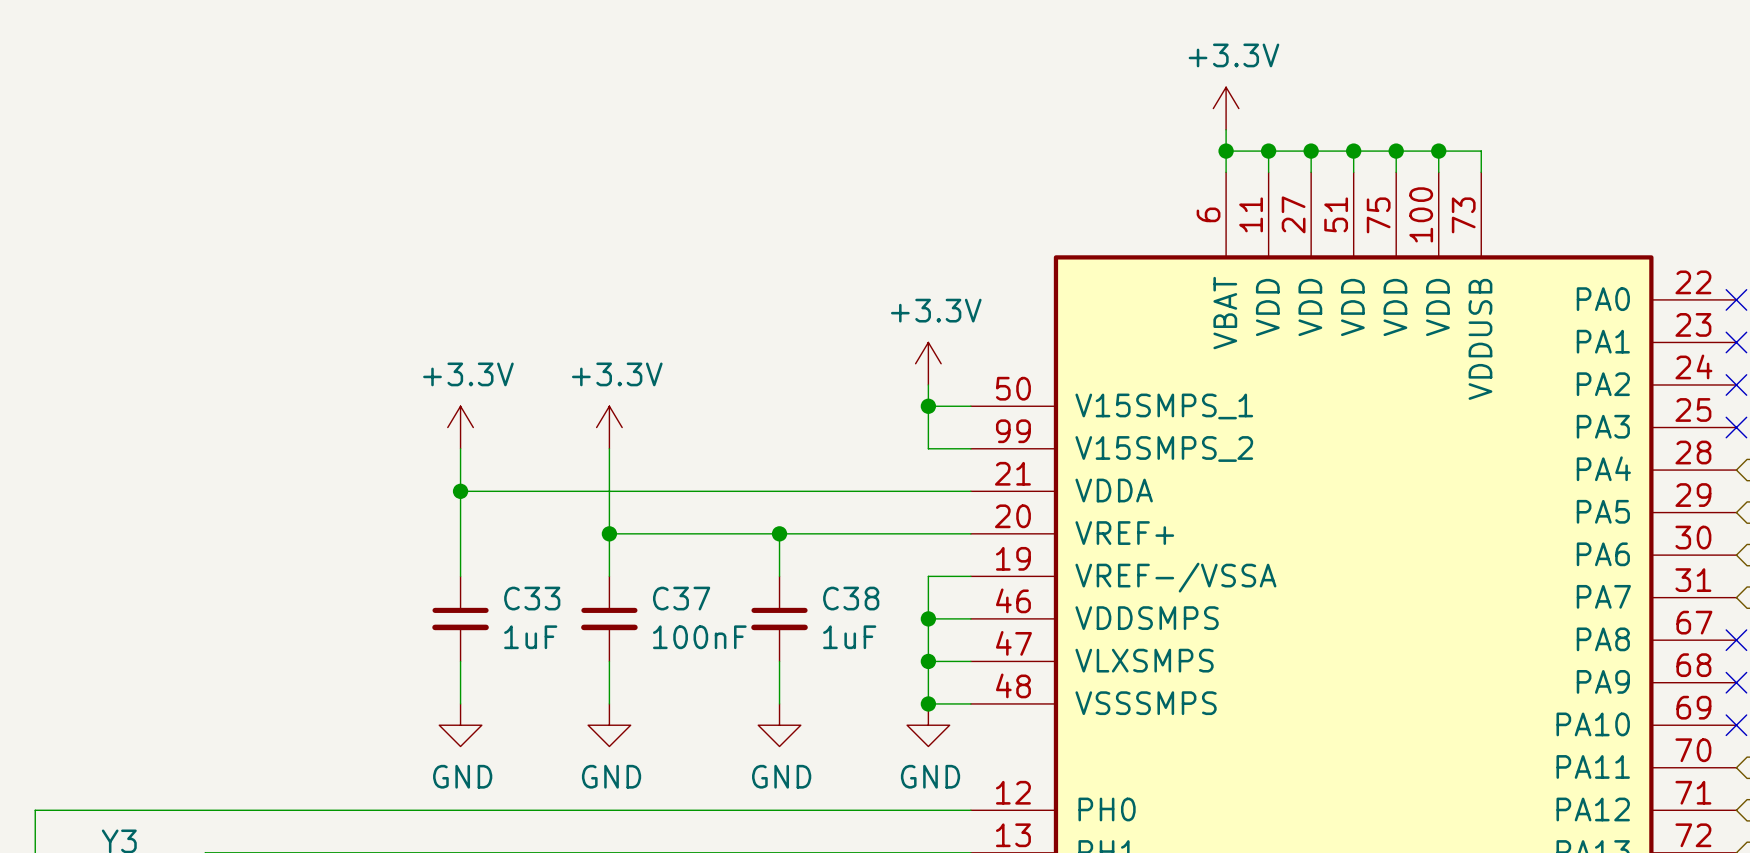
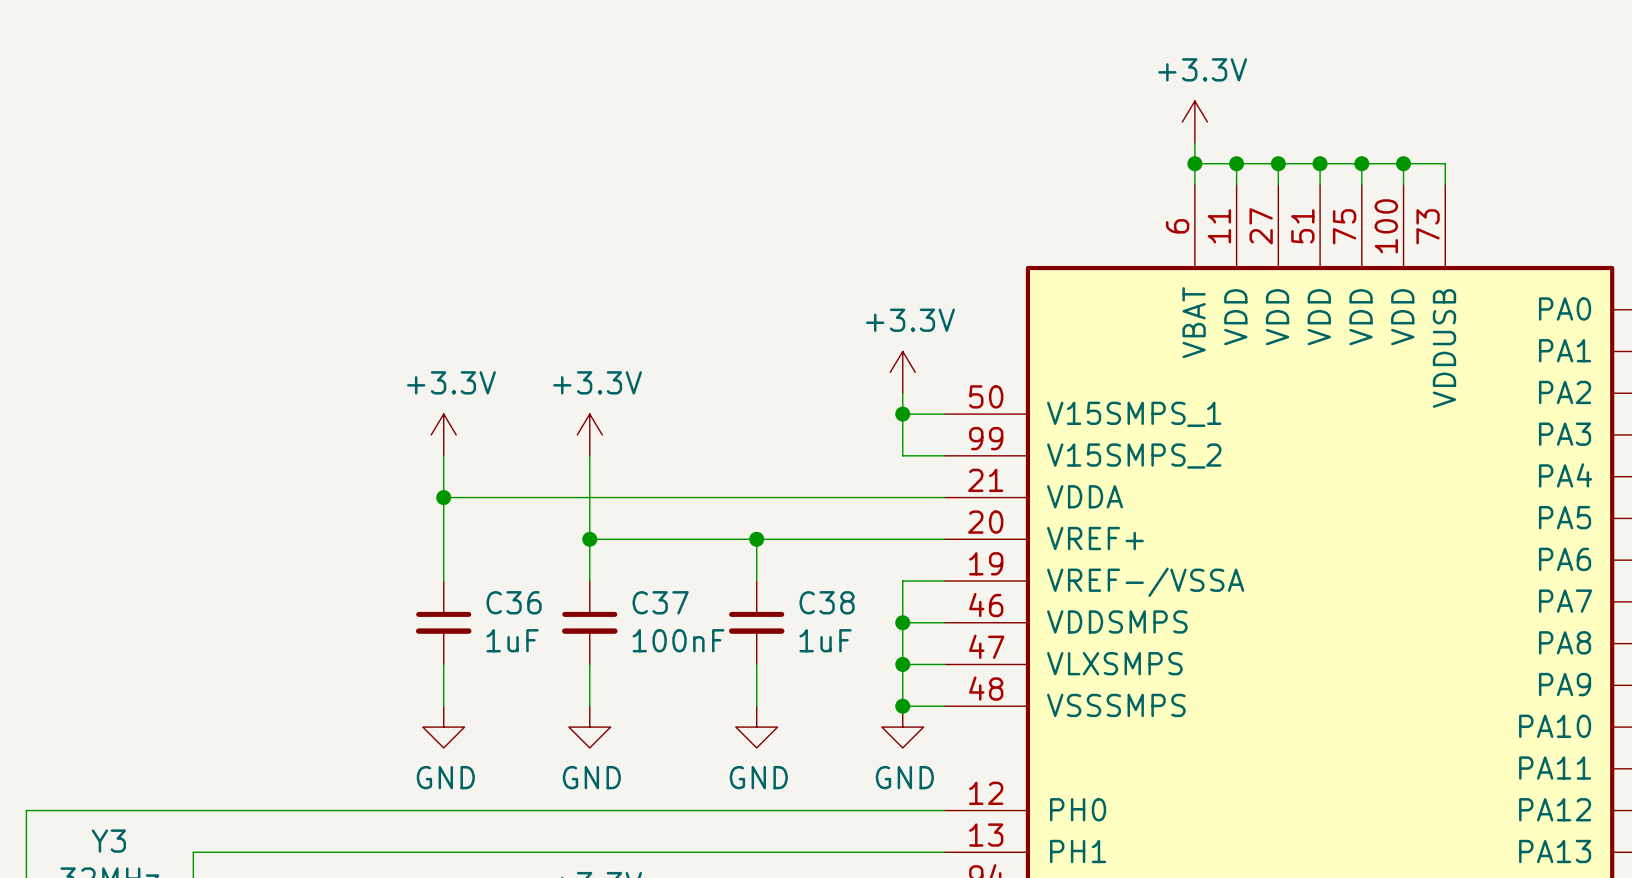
C33 name: C33 (532, 598) -> C36 (514, 602)

